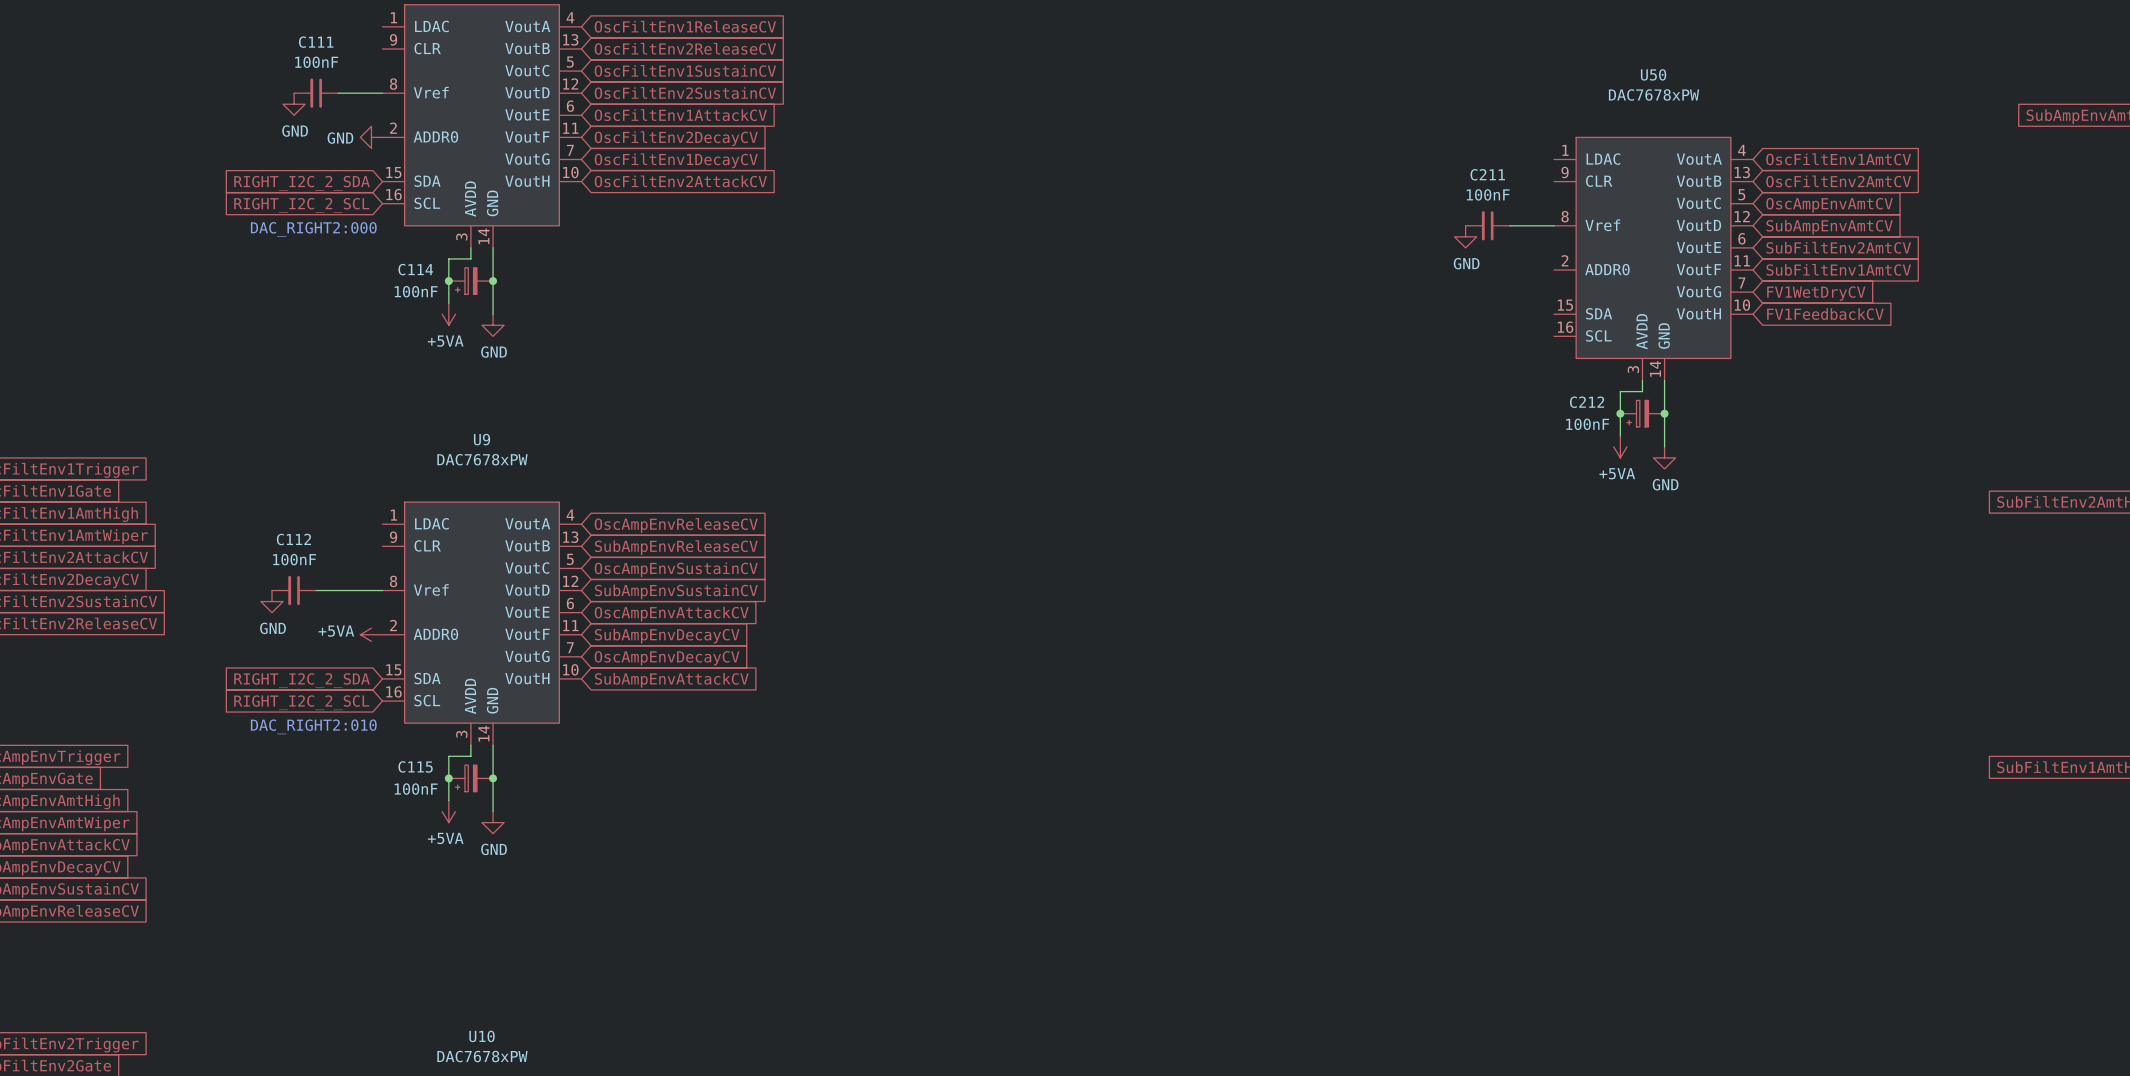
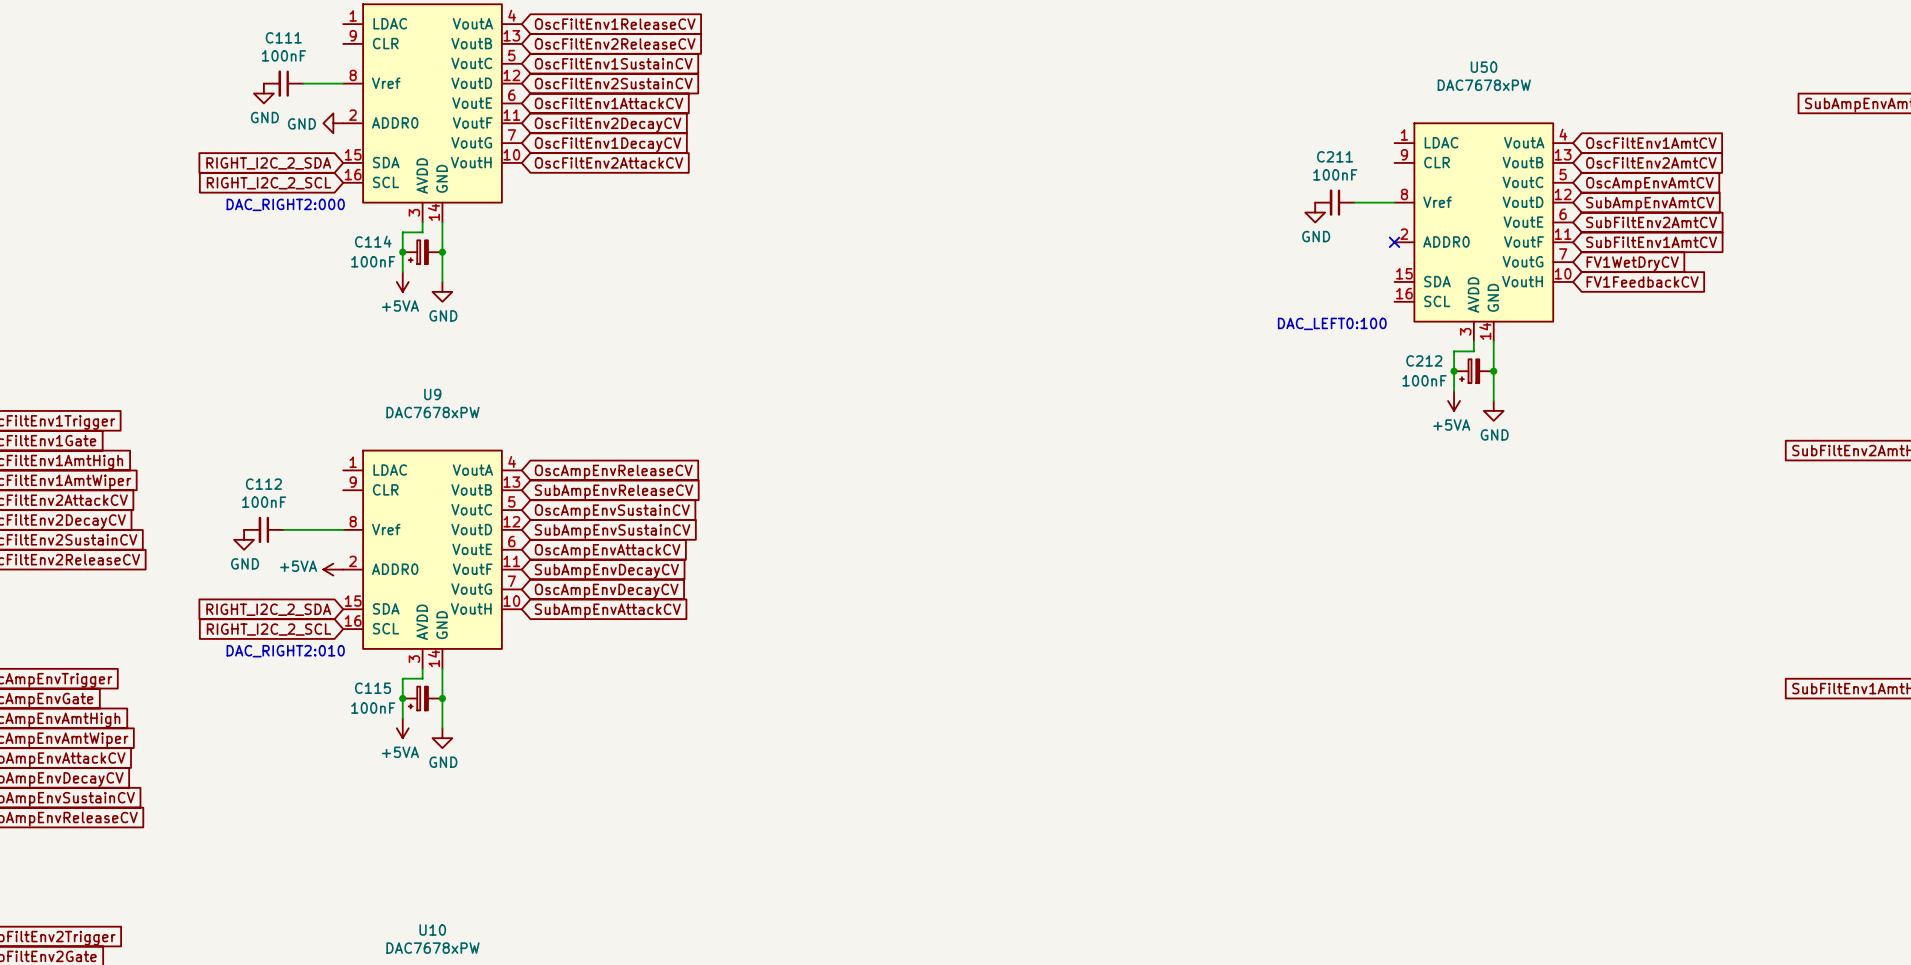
no-connect mark: none -> (1394, 242)
text: none -> DAC_LEFT0:100 (1332, 323)

